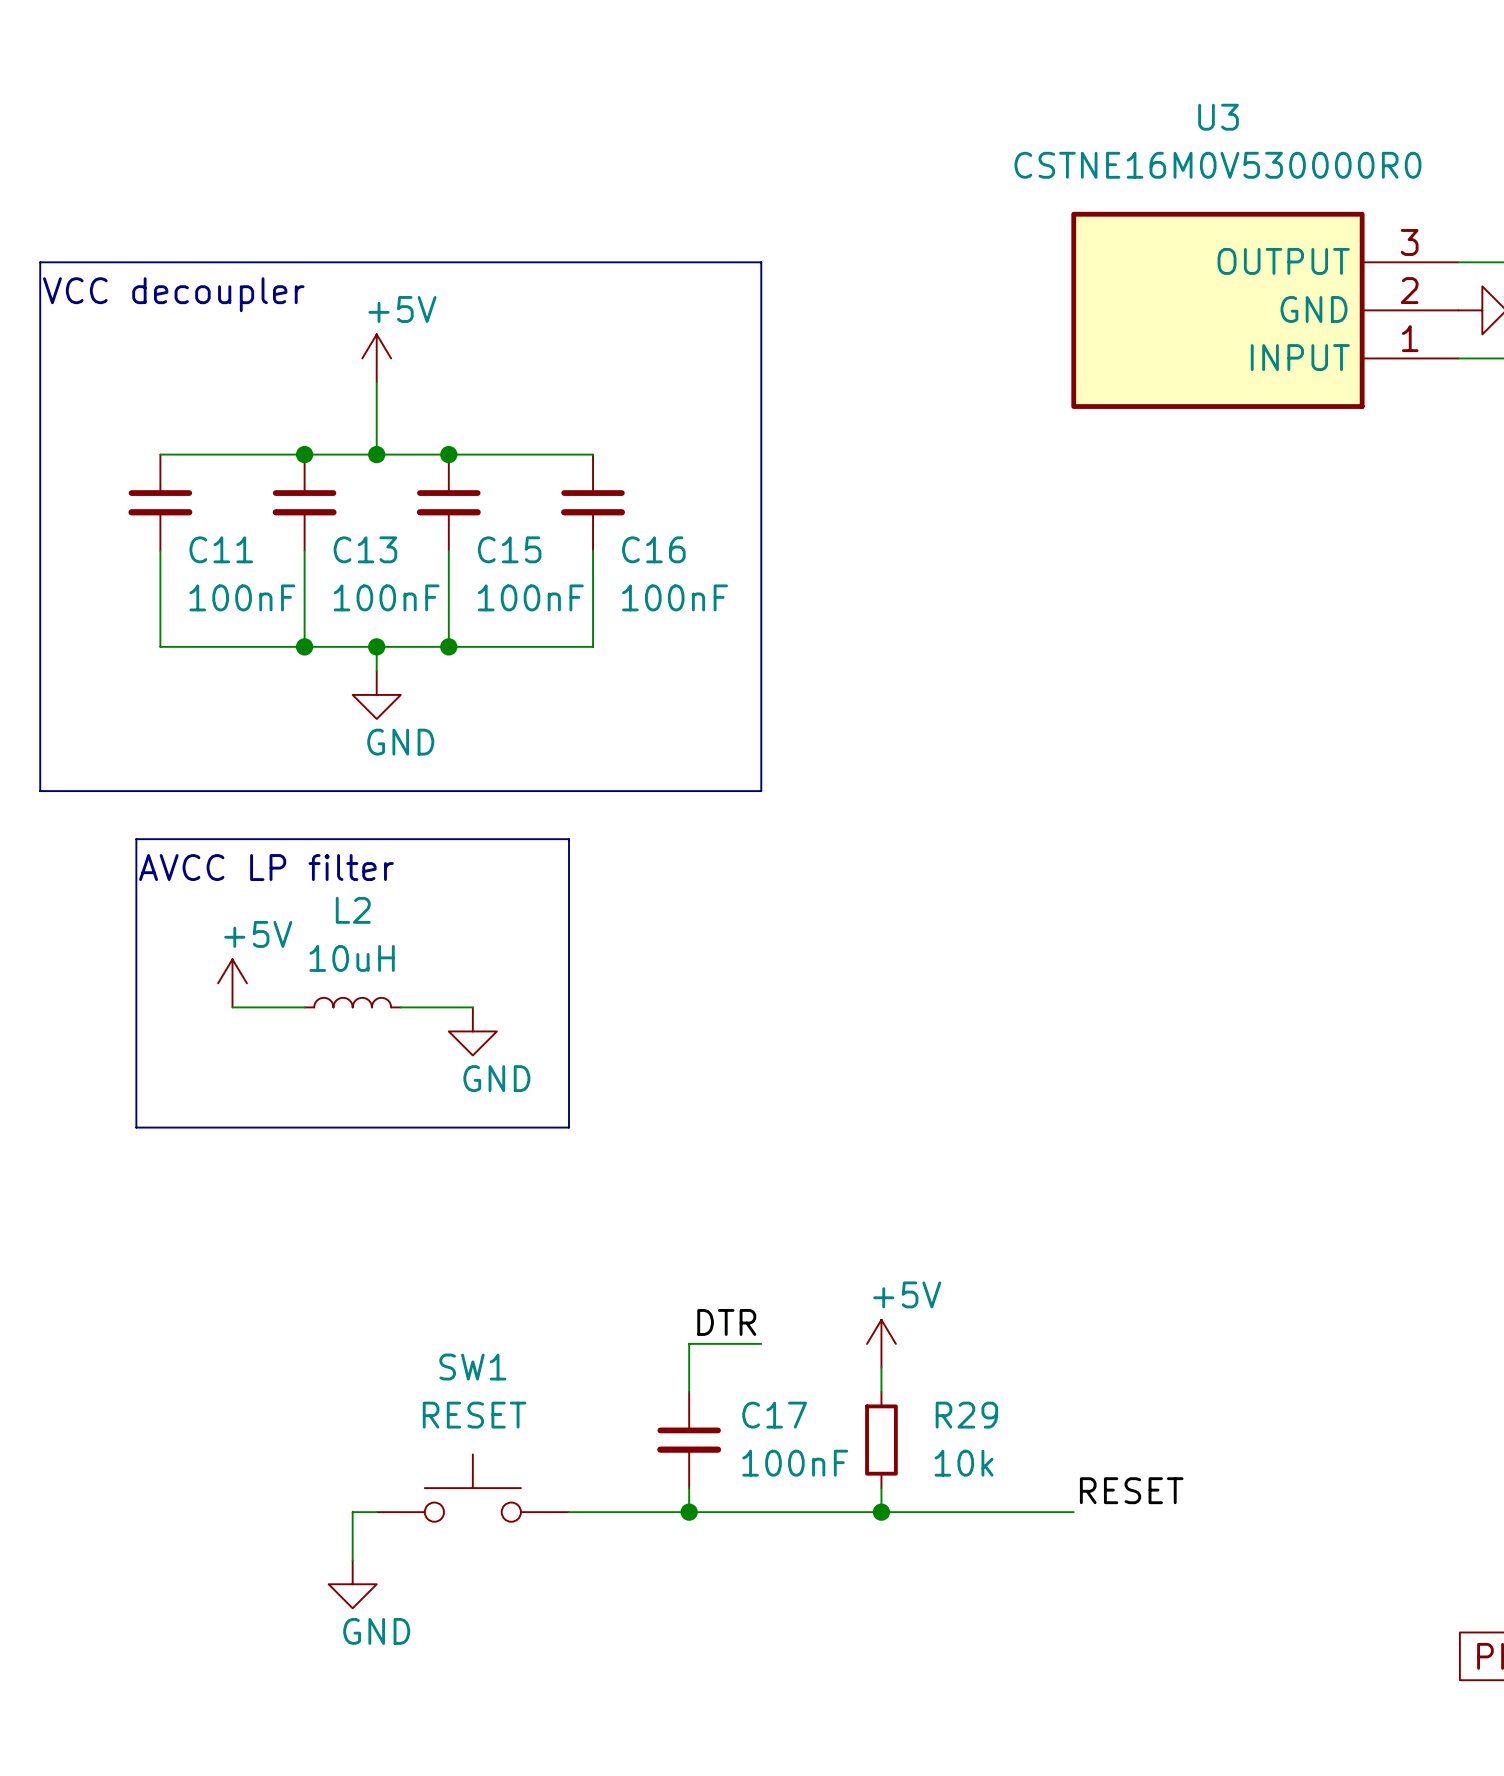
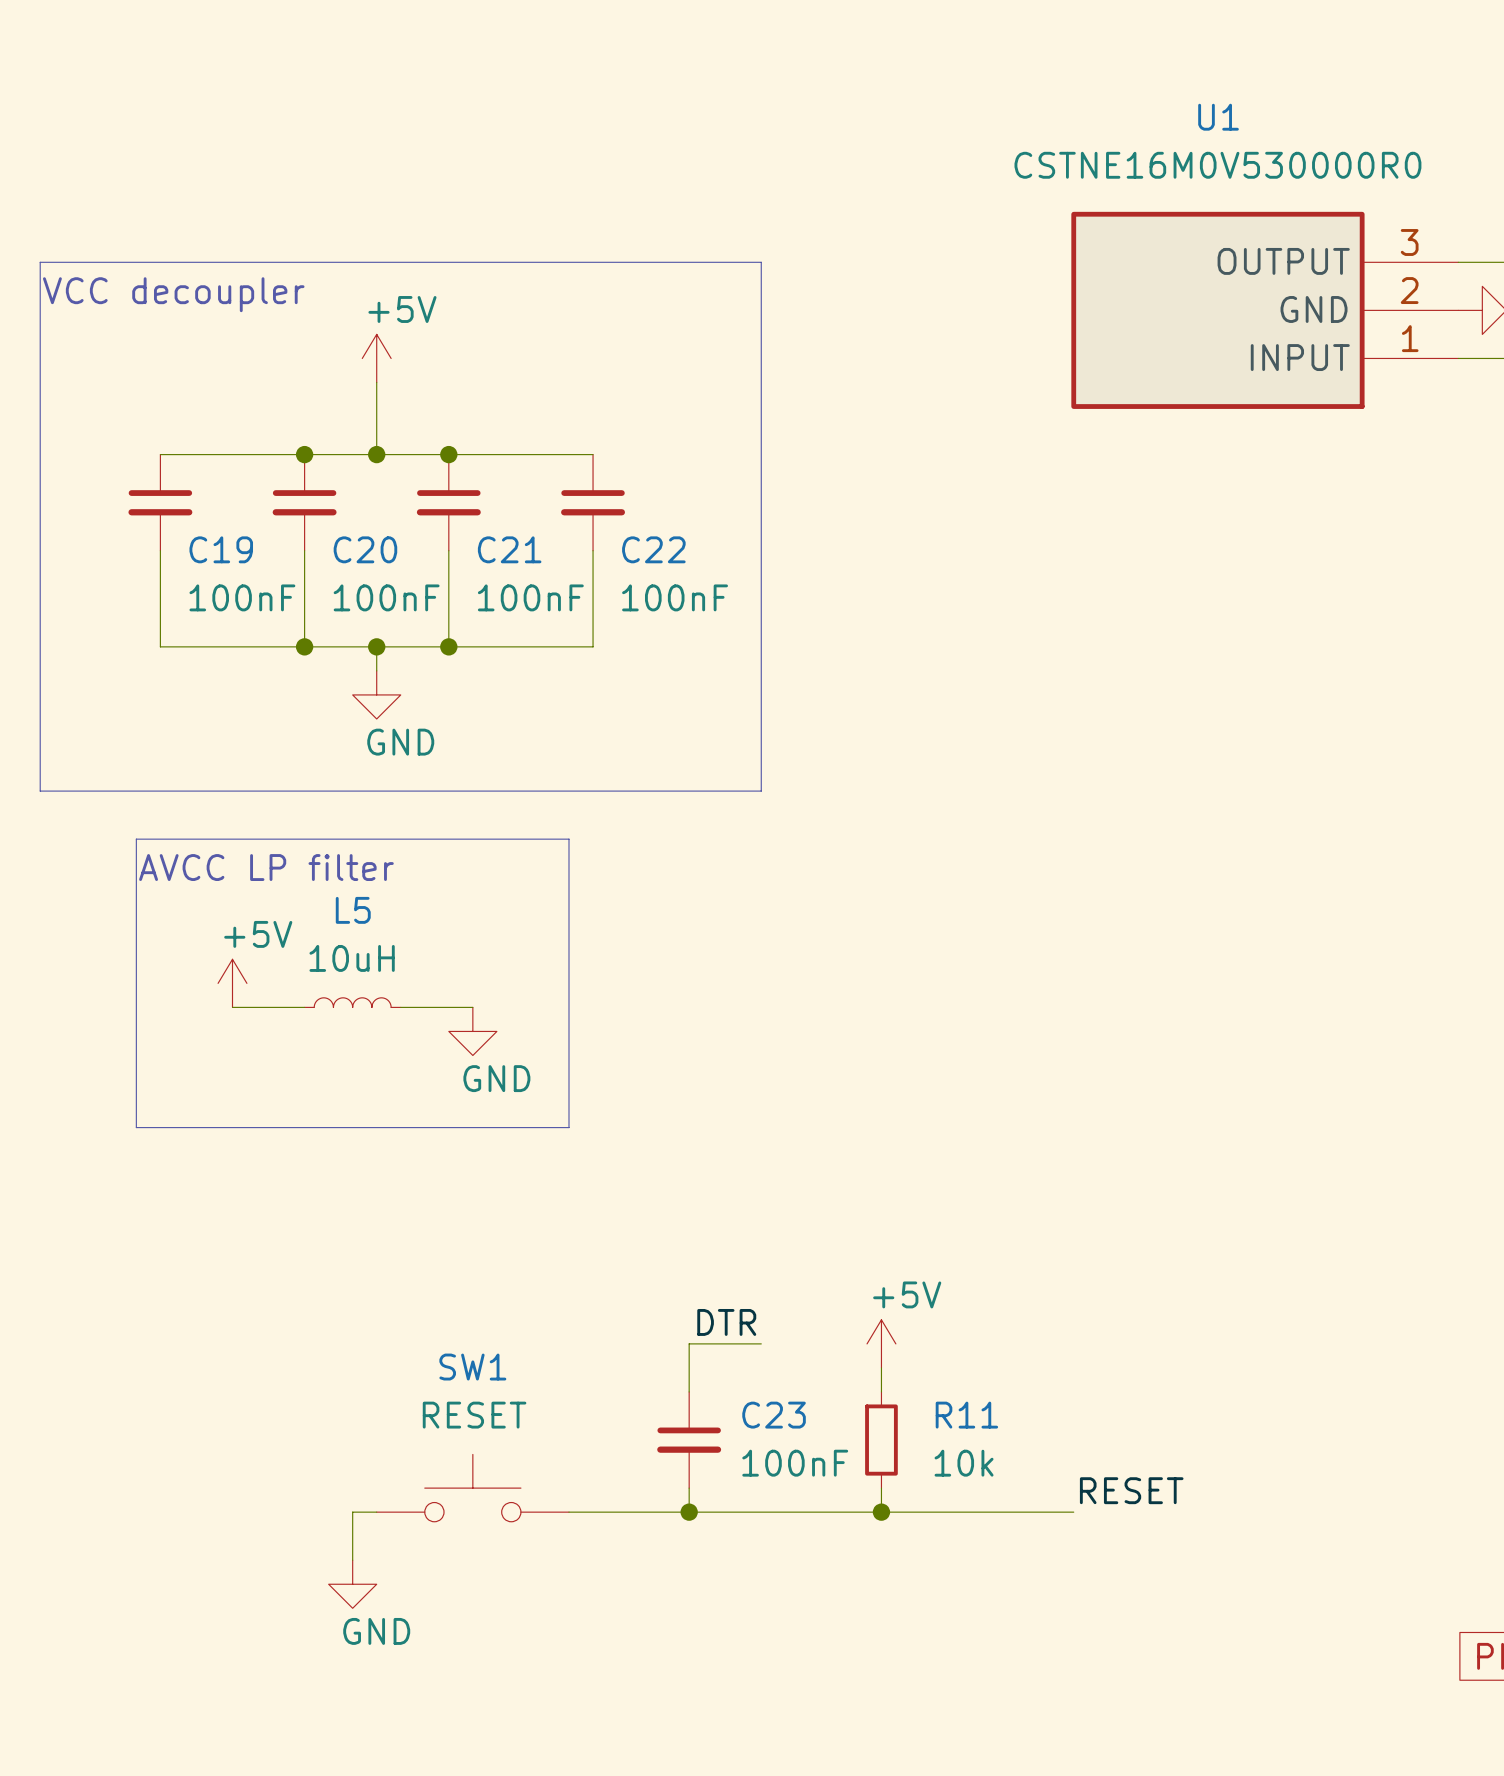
U3 name: U3 (1218, 117) -> U1 (1218, 117)
C11 name: C11 (221, 549) -> C19 (221, 549)
C13 name: C13 (365, 549) -> C20 (365, 549)
C15 name: C15 (509, 549) -> C21 (509, 549)
C16 name: C16 (653, 549) -> C22 (653, 549)
L2 name: L2 (353, 910) -> L5 (353, 910)
C17 name: C17 (774, 1415) -> C23 (774, 1415)
R29 name: R29 (966, 1415) -> R11 (966, 1415)

